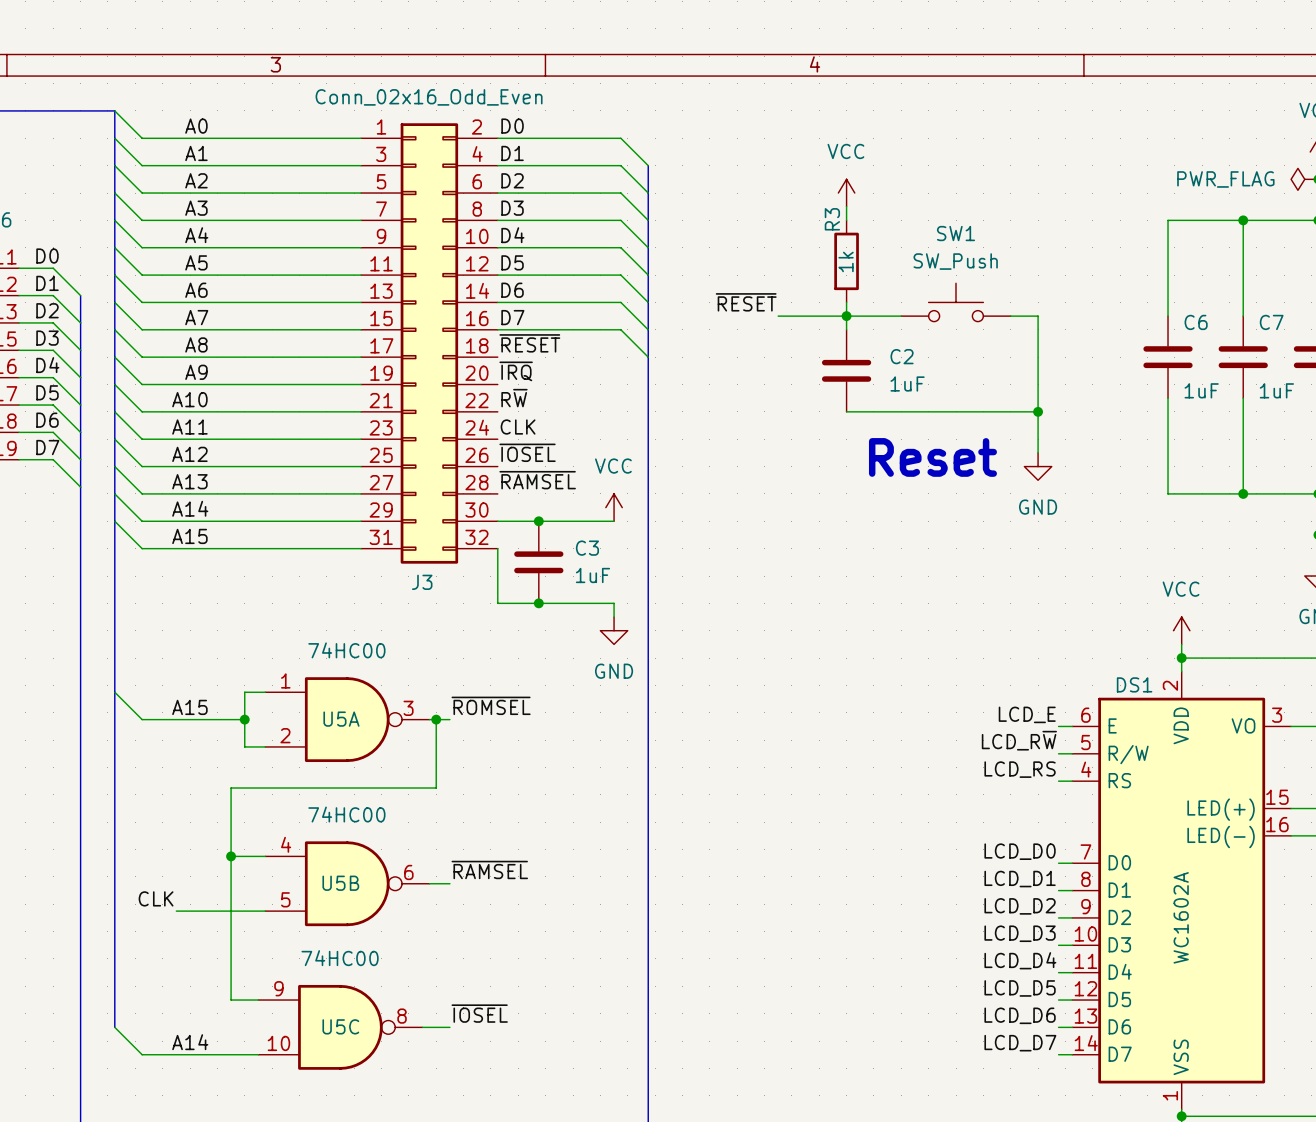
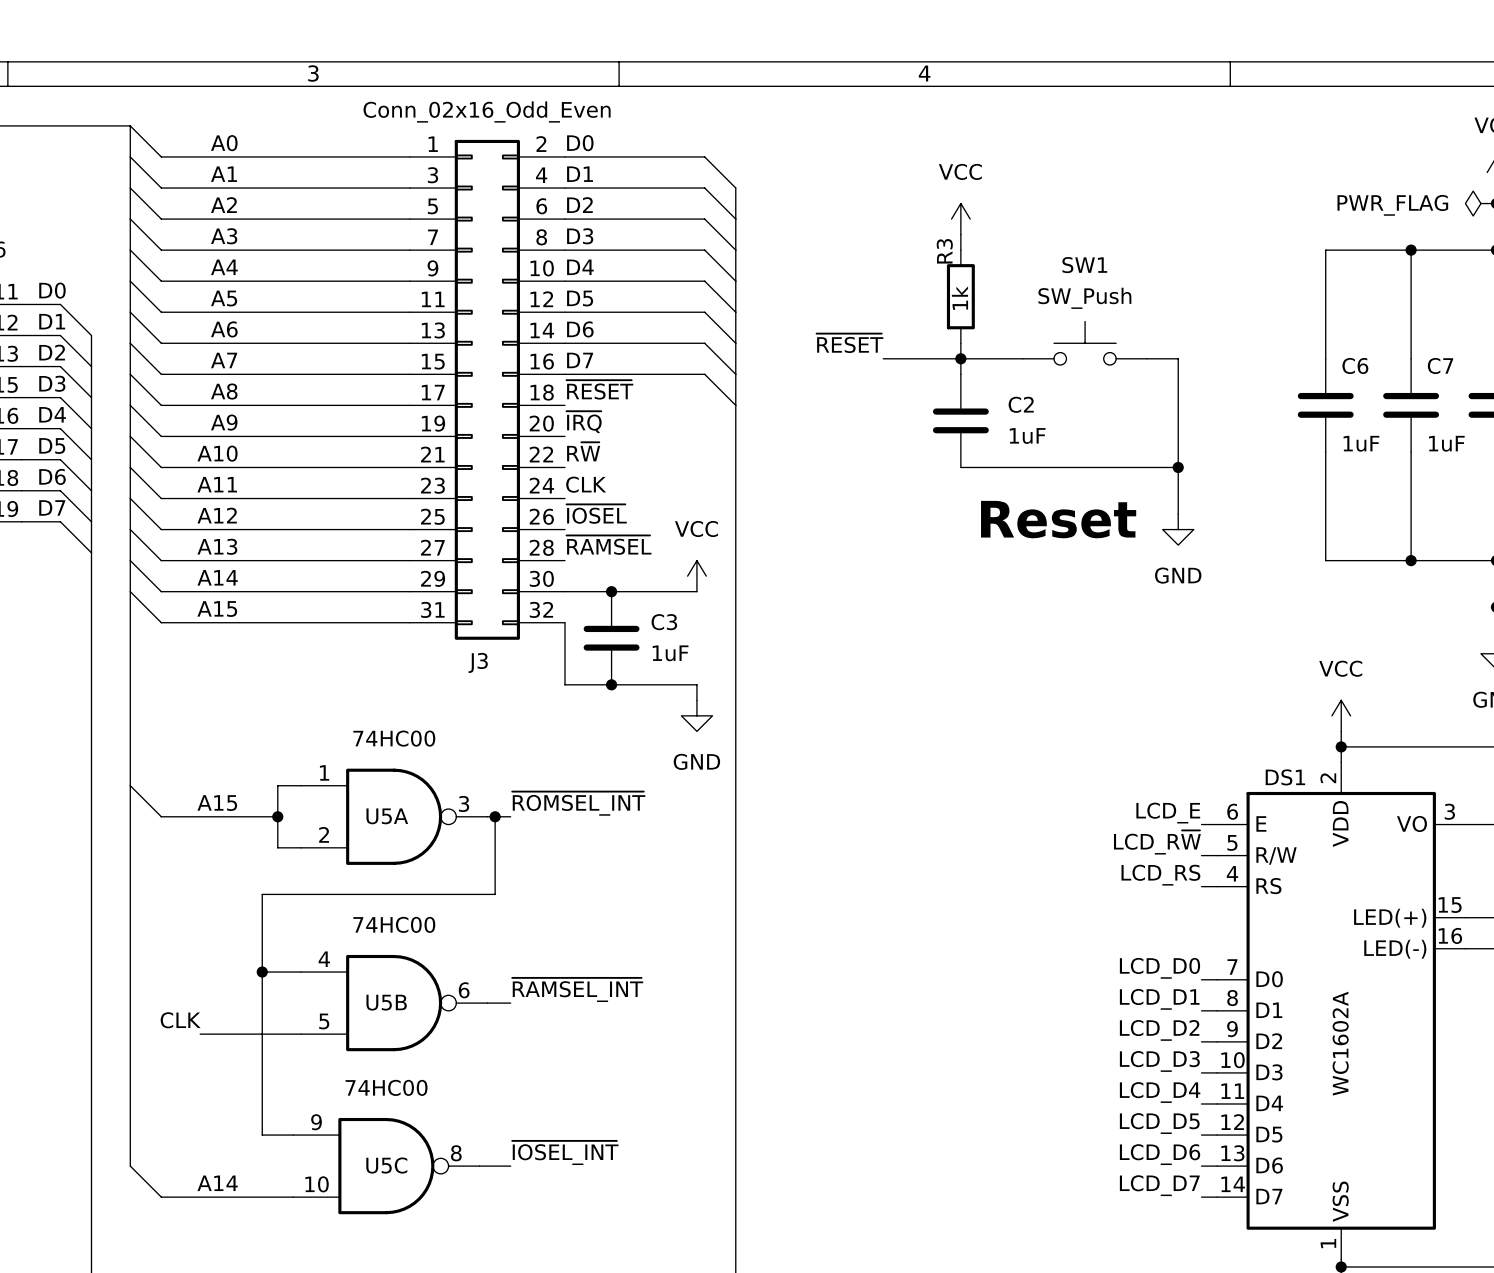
label: ~{ROMSEL} (491, 705) -> ~{ROMSEL_INT} (578, 803)
label: ~{RAMSEL} (489, 869) -> ~{RAMSEL_INT} (577, 989)
label: ~{IOSEL} (479, 1013) -> ~{IOSEL_INT} (565, 1152)

